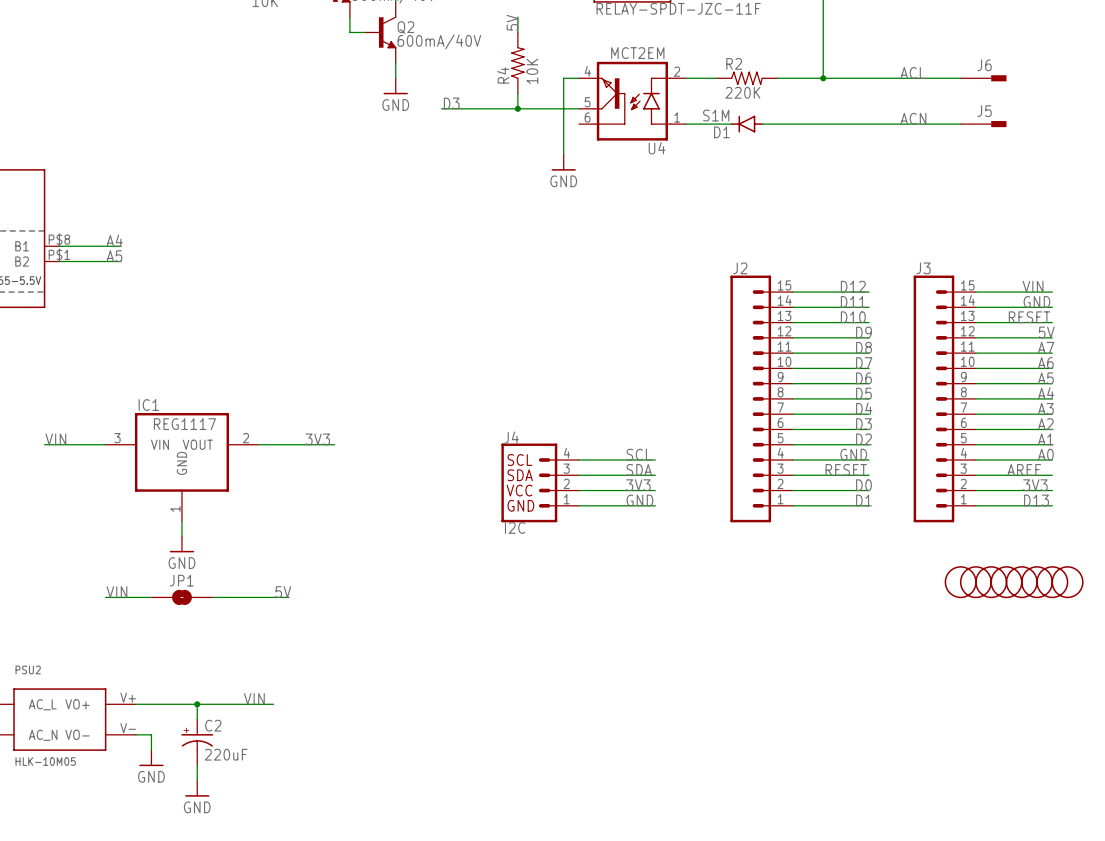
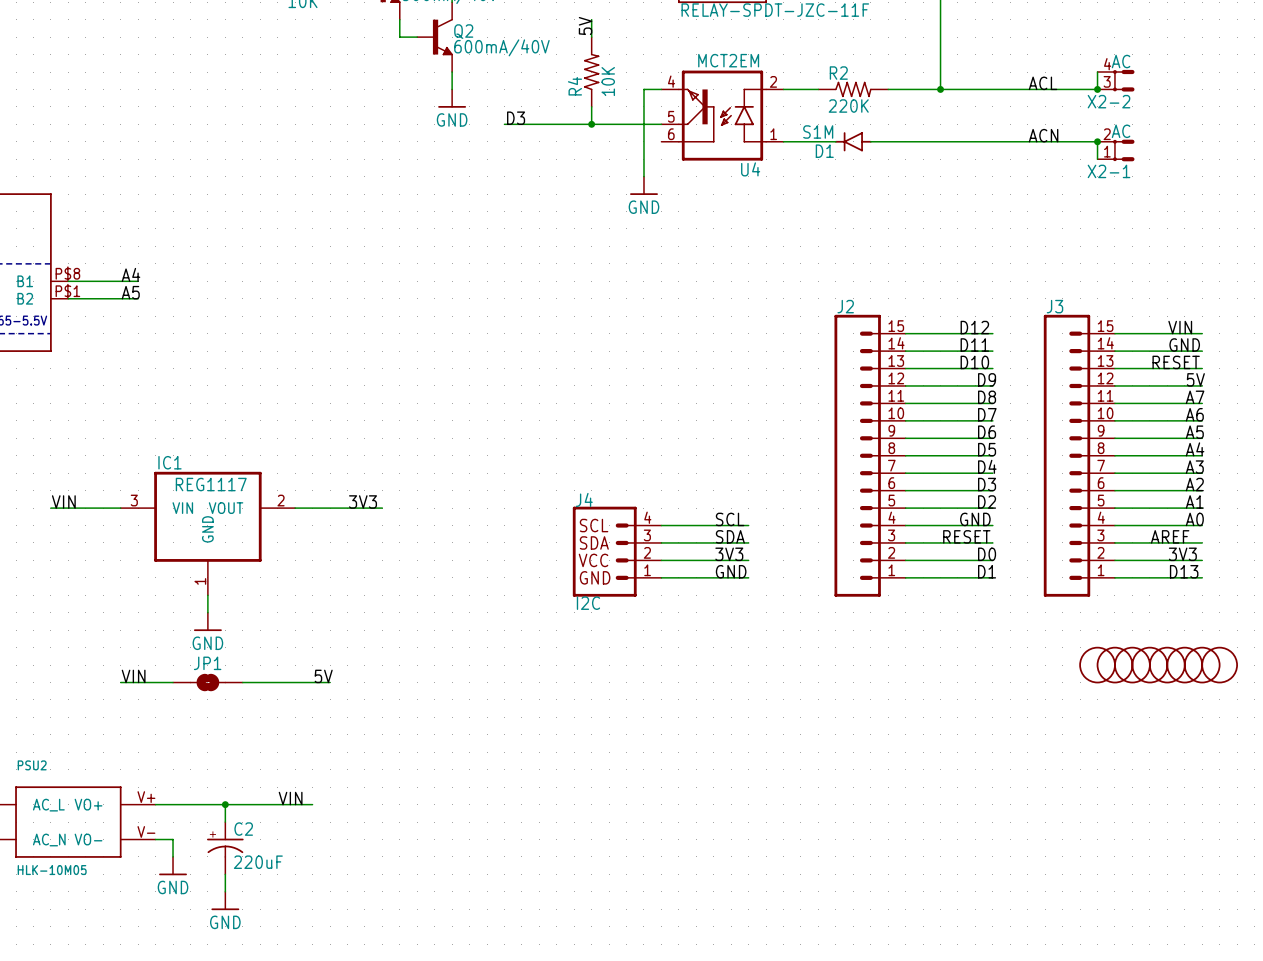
wire: none -> (1097, 72) (1097, 89)
X2-2: none -> AC (1116, 80)
junction: none -> (1097, 89)
J6: (983, 78) -> none
wire: none -> (1097, 141) (1097, 159)
junction: none -> (1097, 141)
J5: (983, 124) -> none
X2-1: none -> AC (1116, 150)

